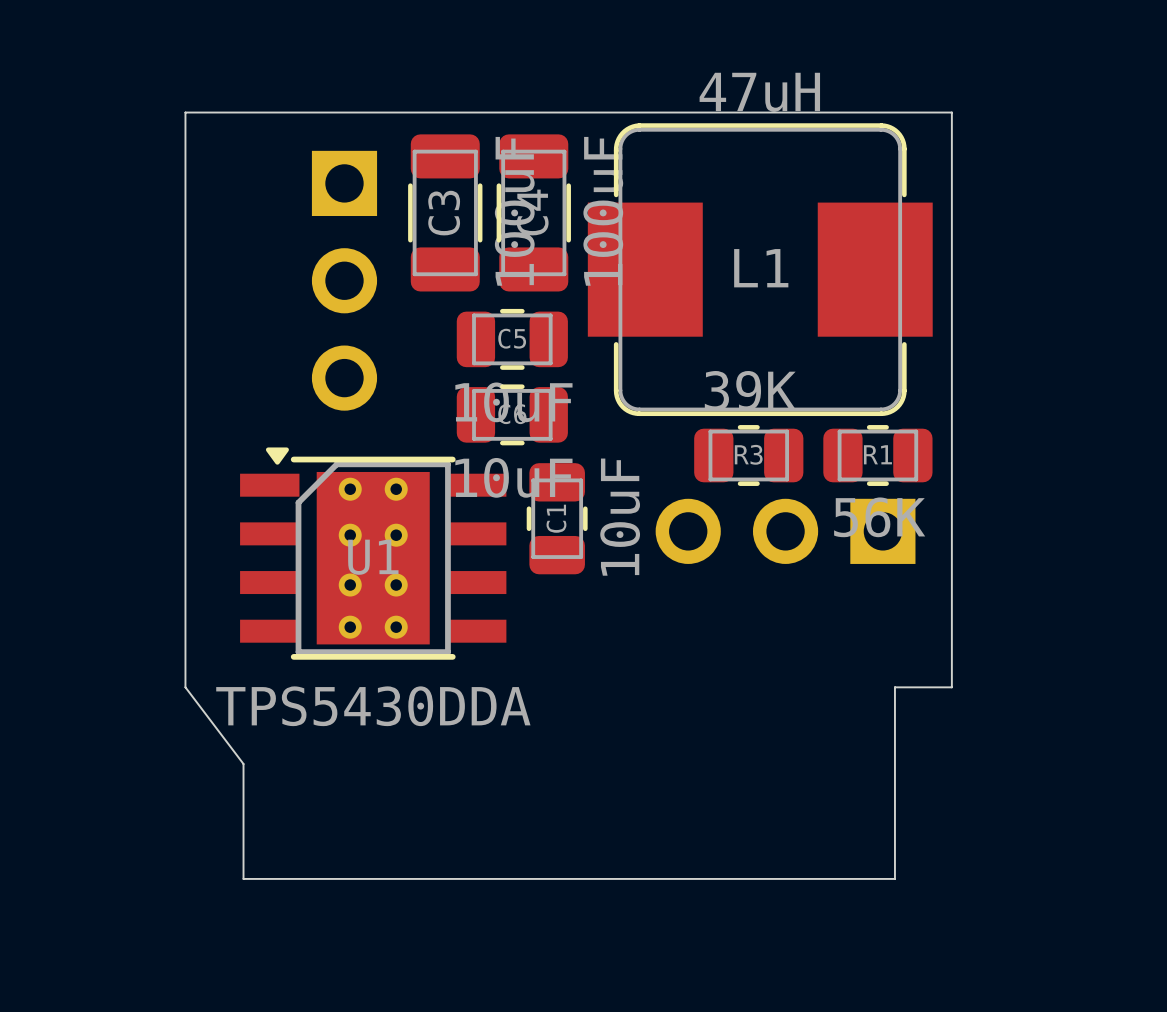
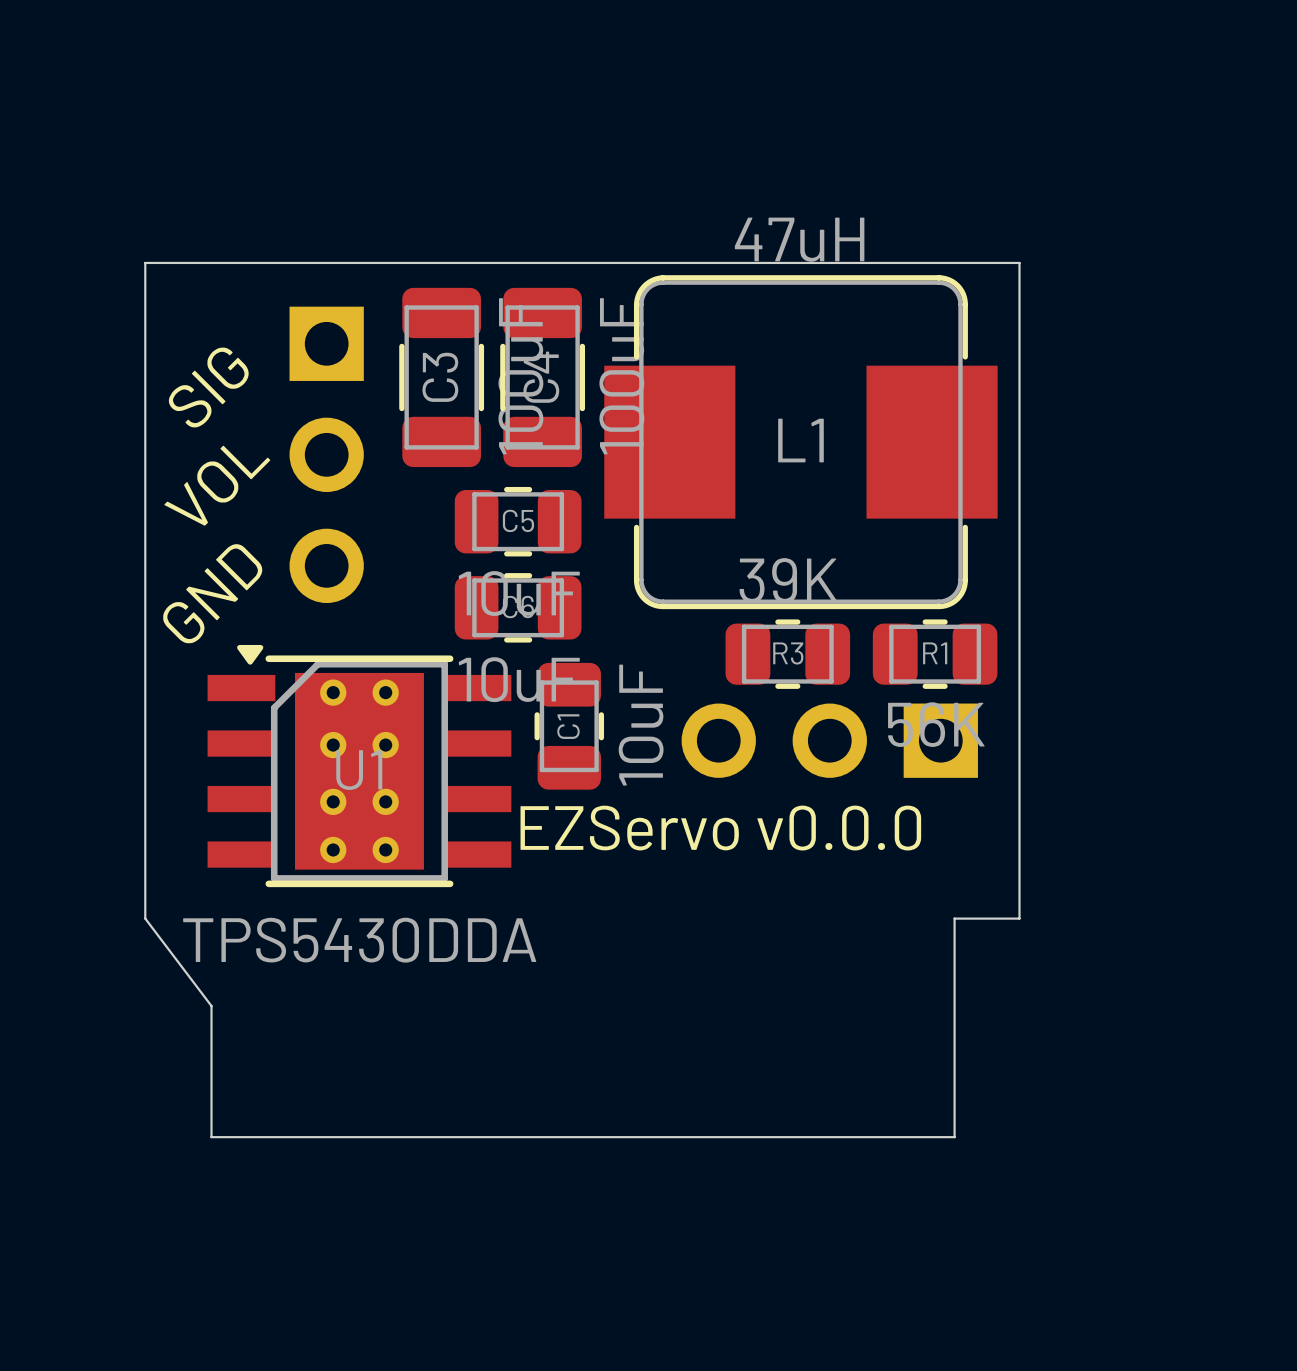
text: none -> SIG (208, 387)
text: none -> VOL (217, 485)
text: none -> GND (212, 593)
text: none -> EZServo v0.0.0 (720, 828)

